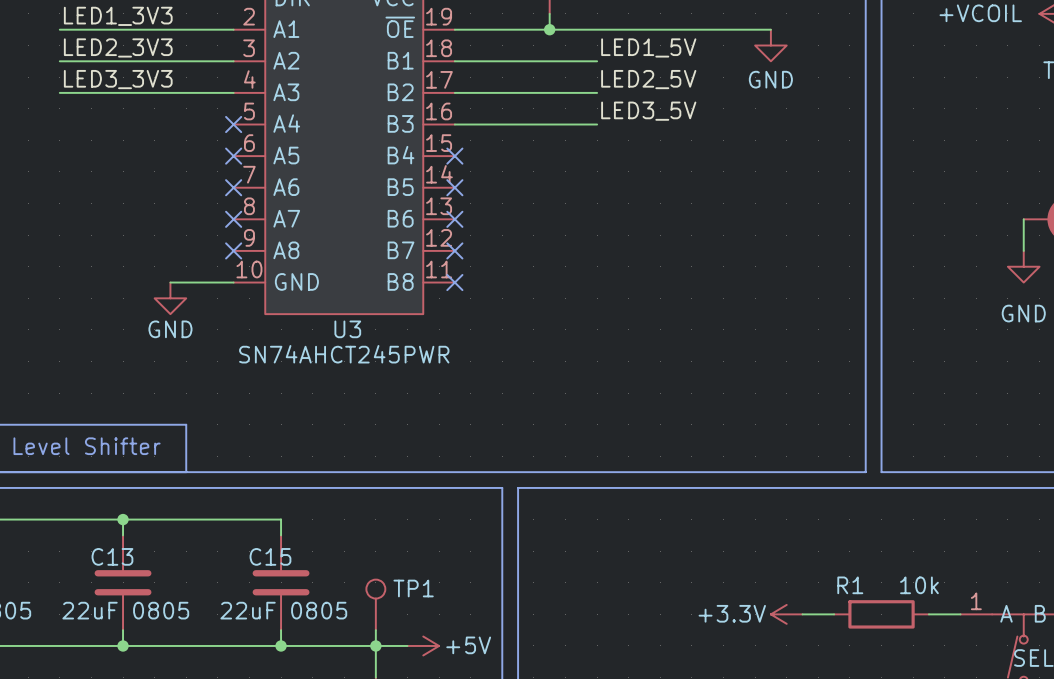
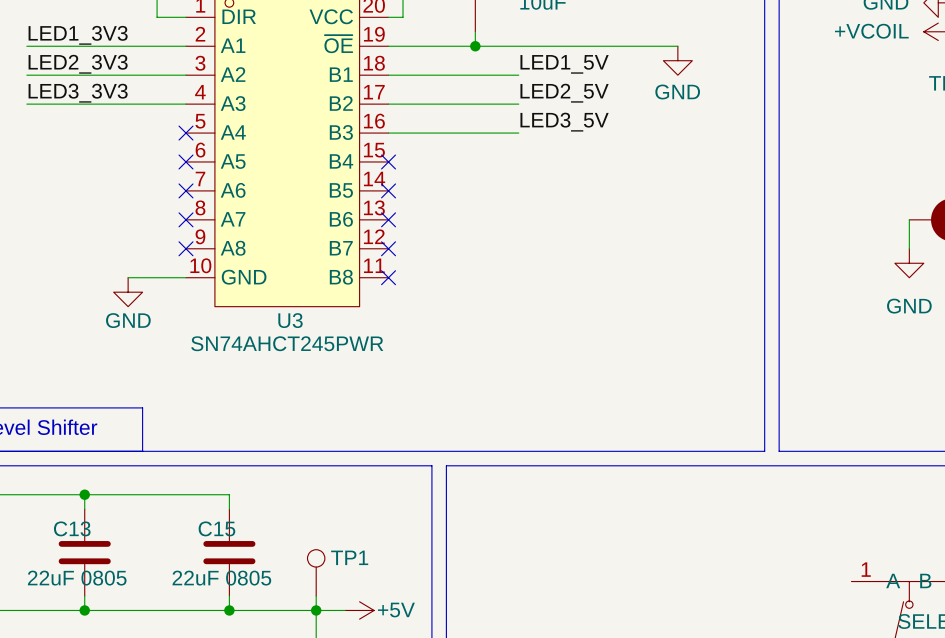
power symbol: +3.3V (786, 614) -> none
wire: (802, 614) (834, 614) -> none
R1: 10k (881, 614) -> none
wire: (928, 614) (960, 614) -> none

